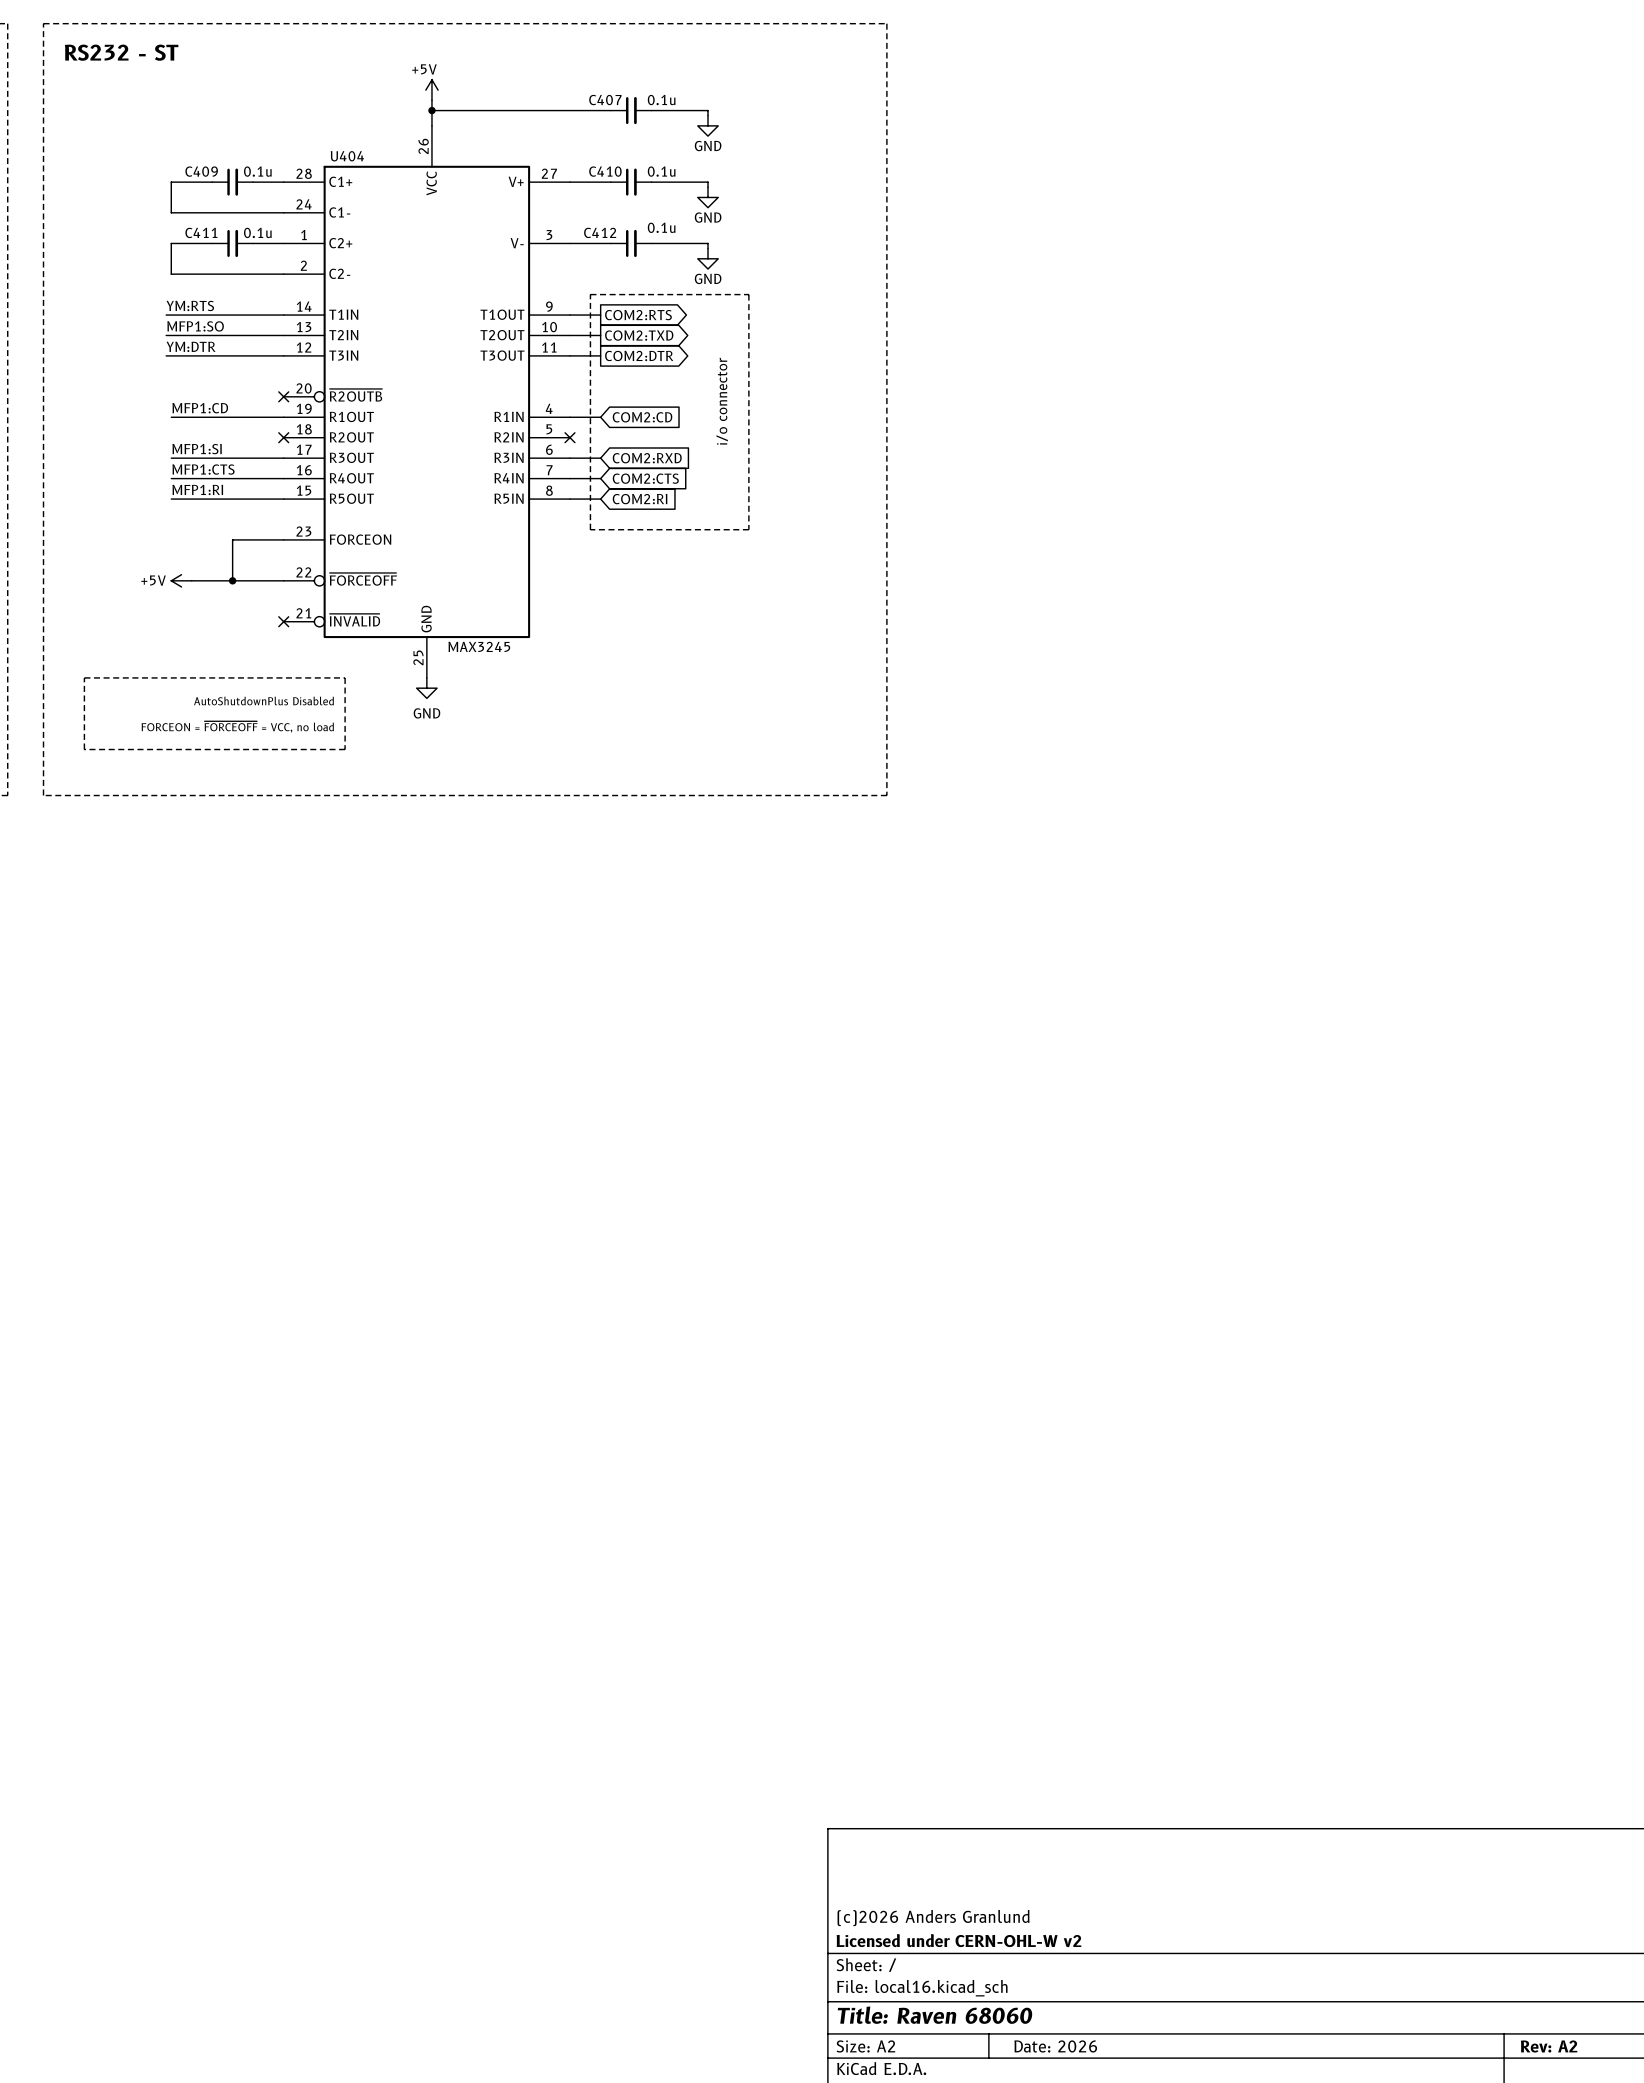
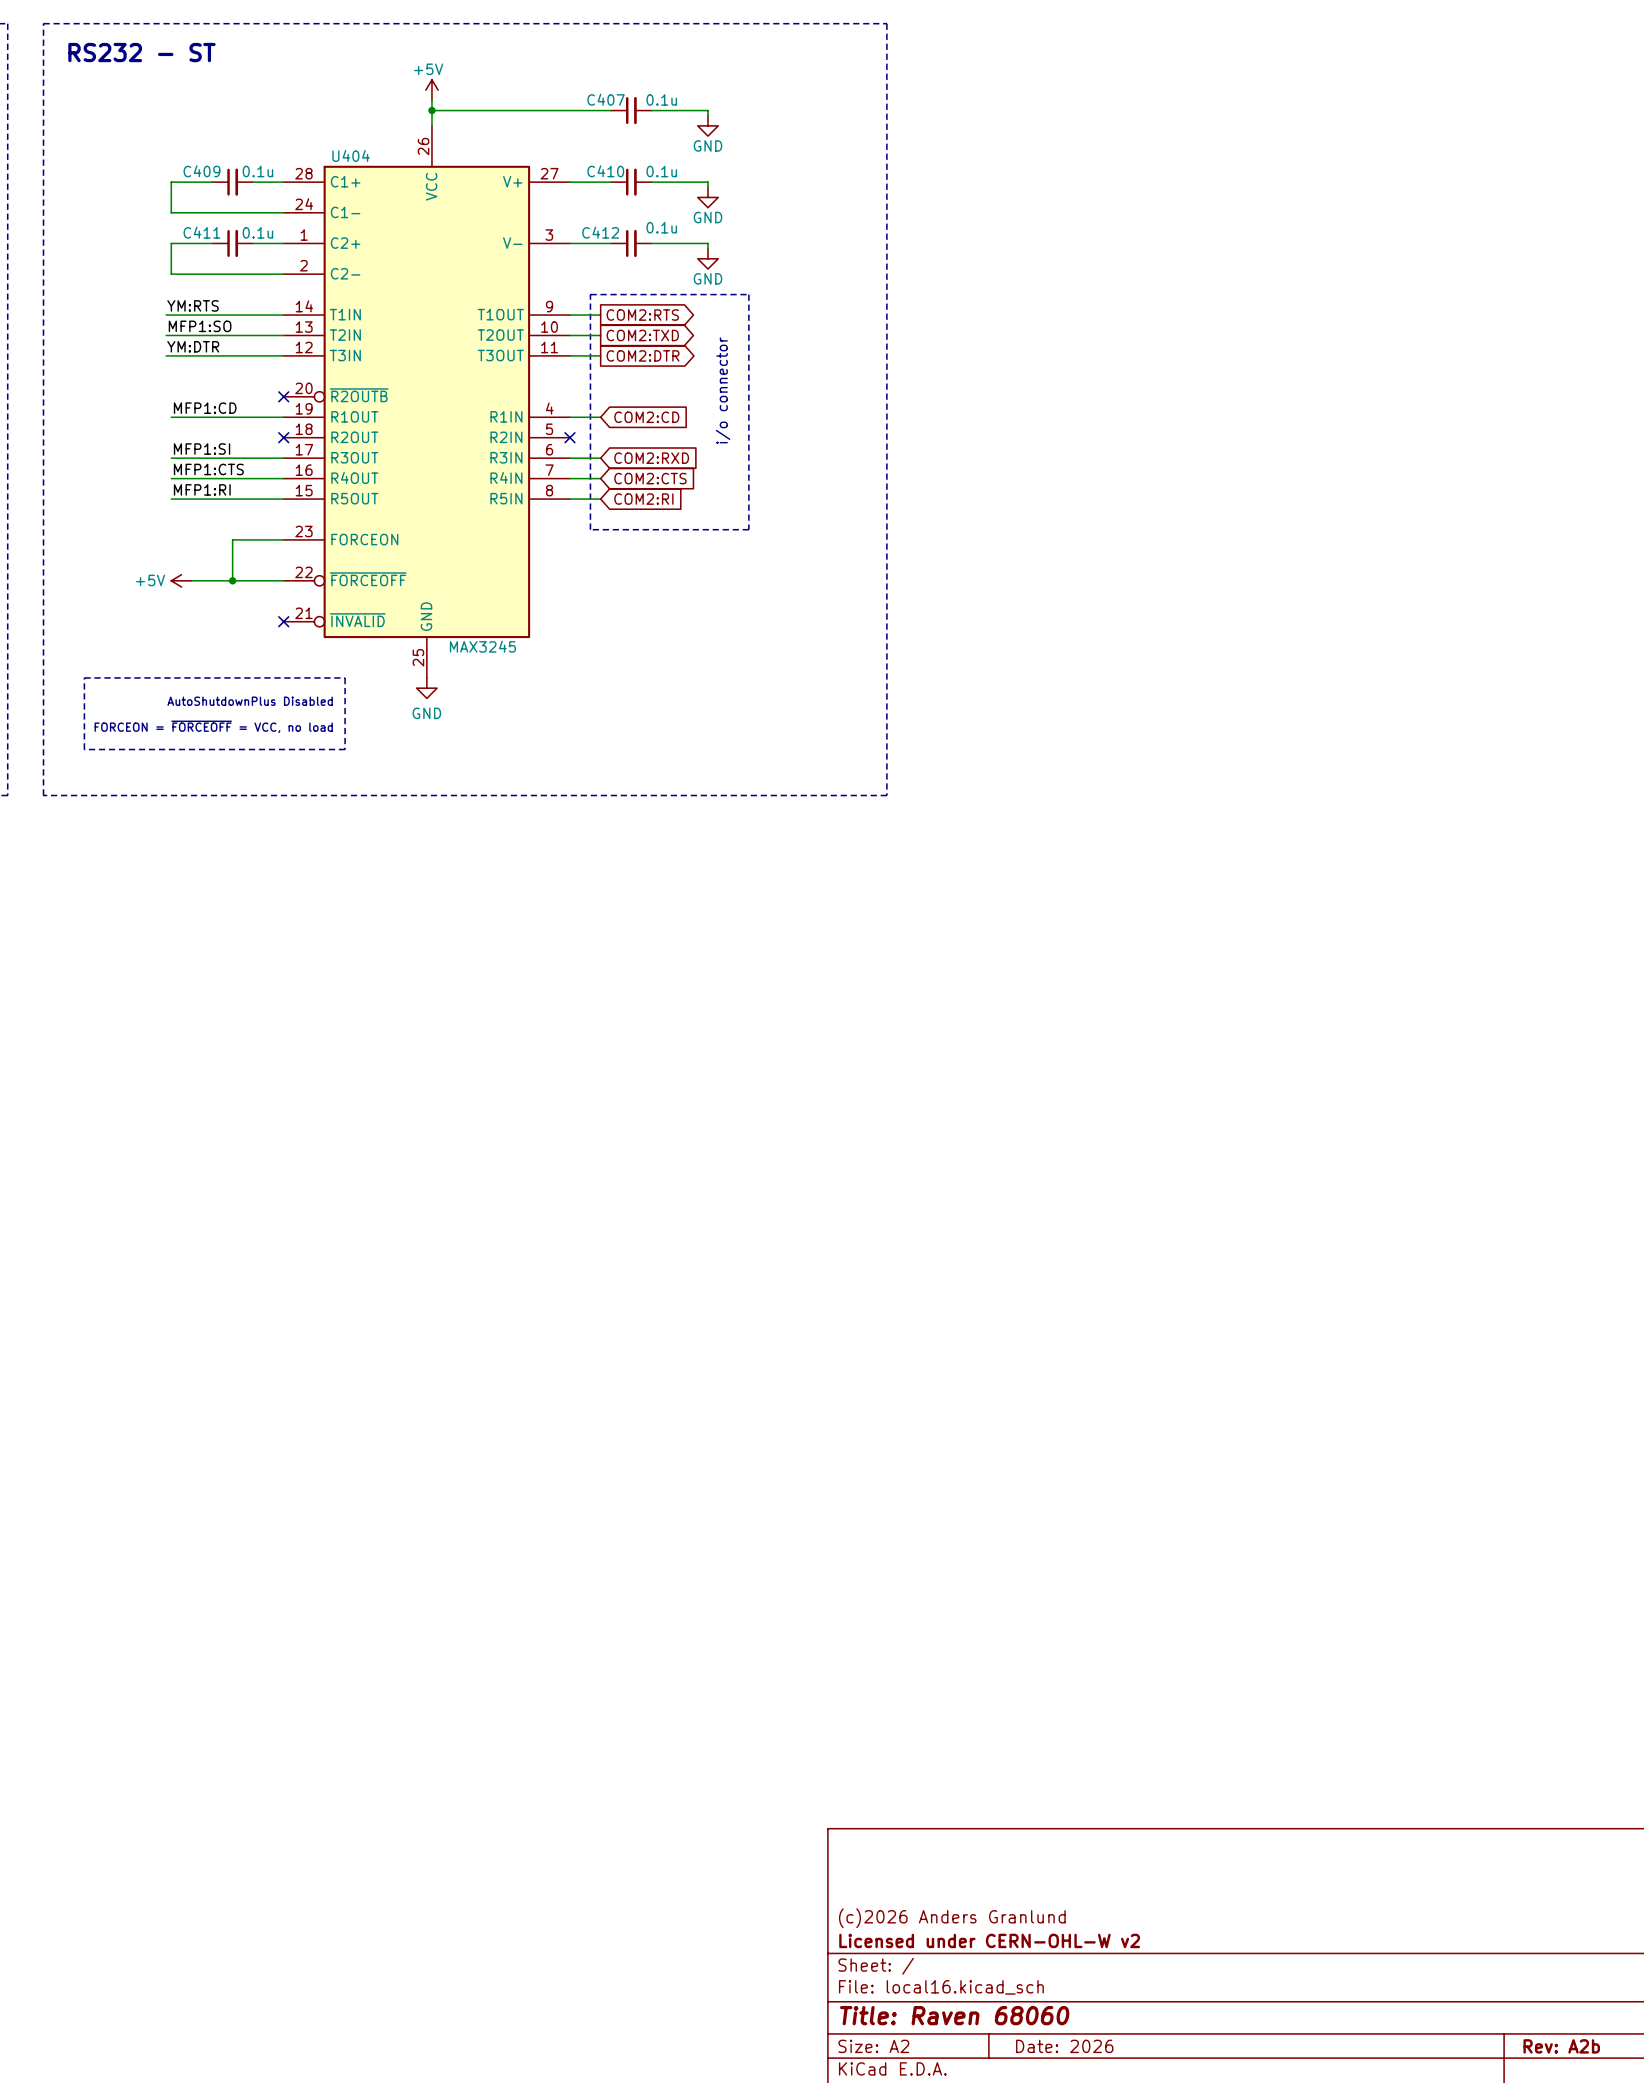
title block: Rev: A2 (1549, 2046) -> Rev: A2b (1561, 2046)

